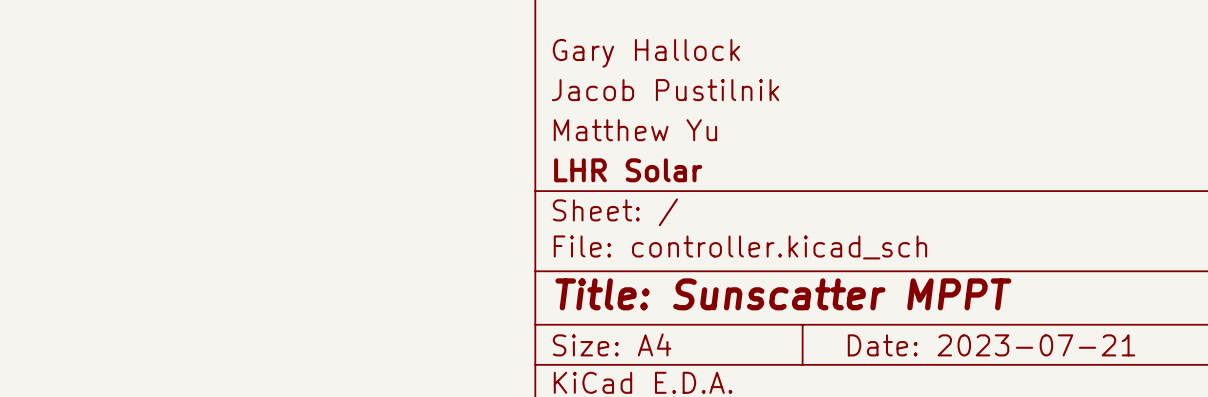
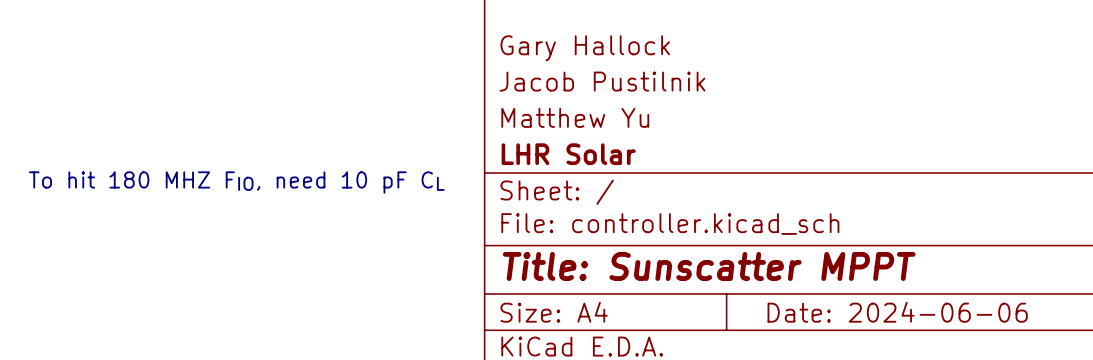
text: none -> To hit 180 MHZ FIO, need 10 pF CL (236, 182)
title block: Date: 2023-07-21 (991, 345) -> Date: 2024-06-06 (897, 312)

